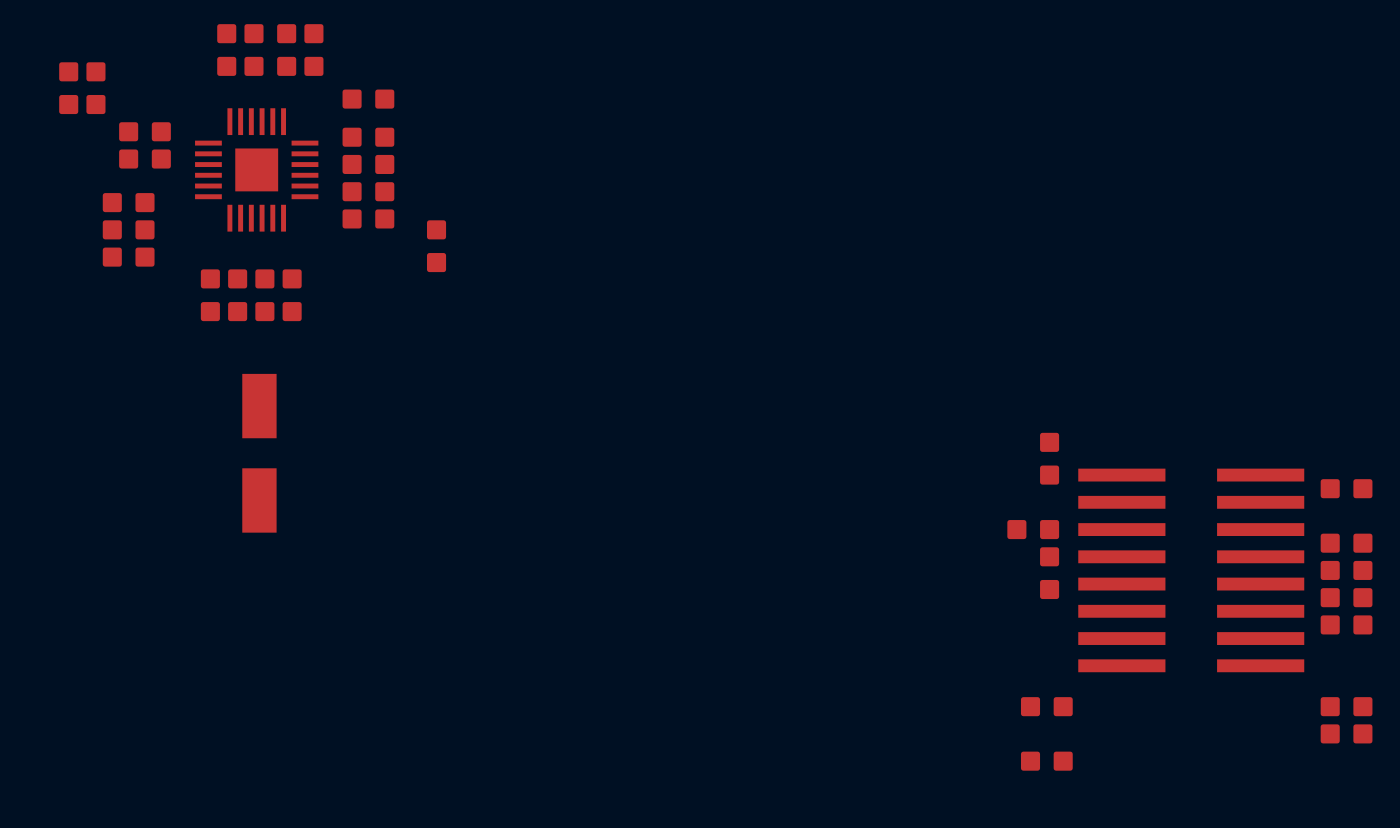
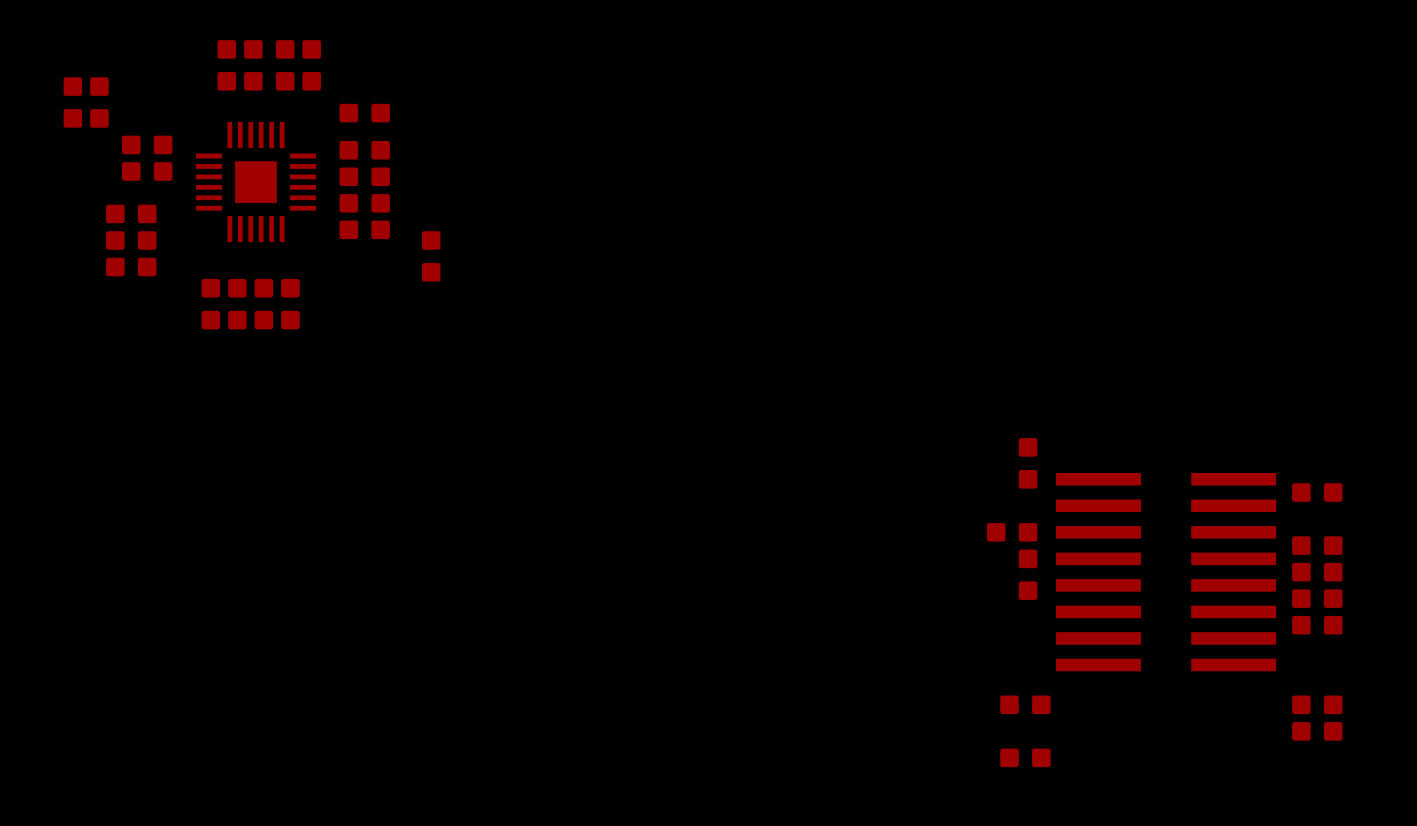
part: (259, 453) -> none

